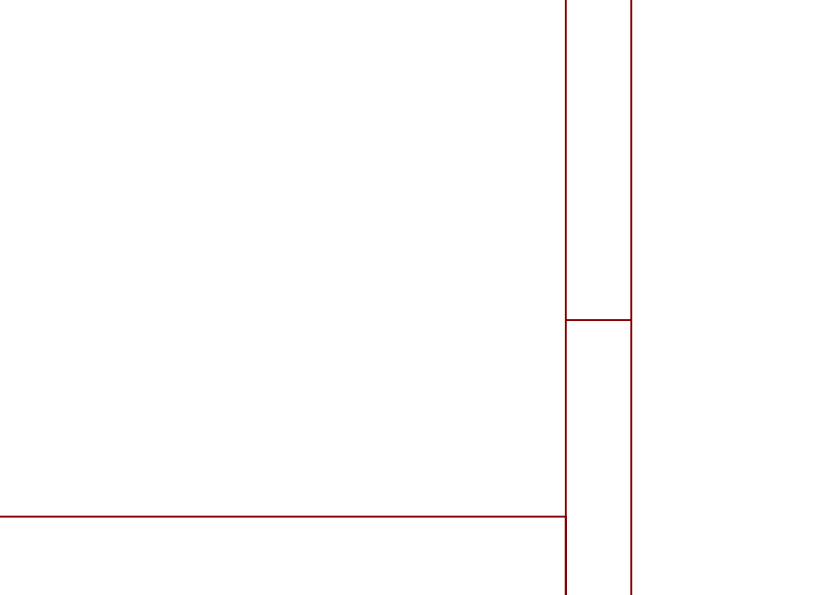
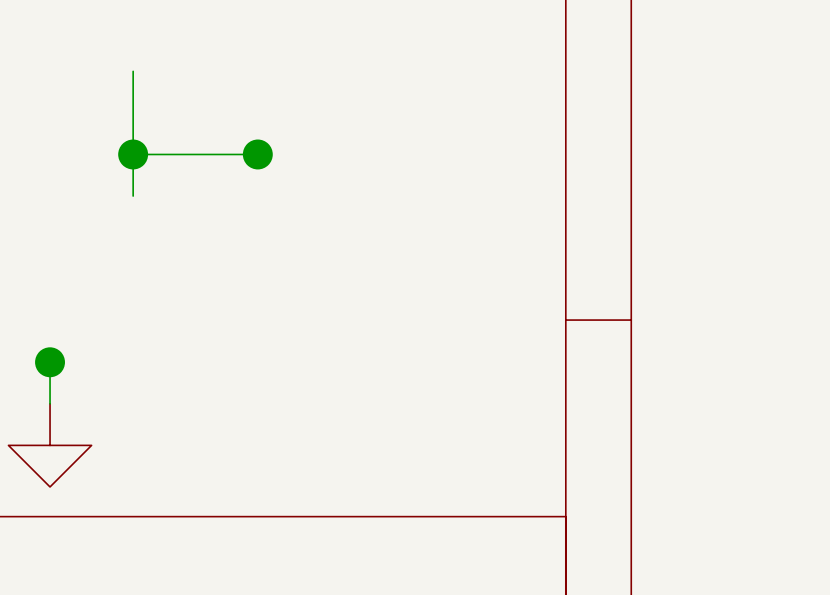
wire: none -> (133, 71) (133, 196)
wire: none -> (133, 154) (257, 154)
junction: none -> (133, 154)
junction: none -> (257, 154)
wire: none -> (50, 362) (50, 403)
junction: none -> (50, 362)
power symbol: none -> (50, 445)

